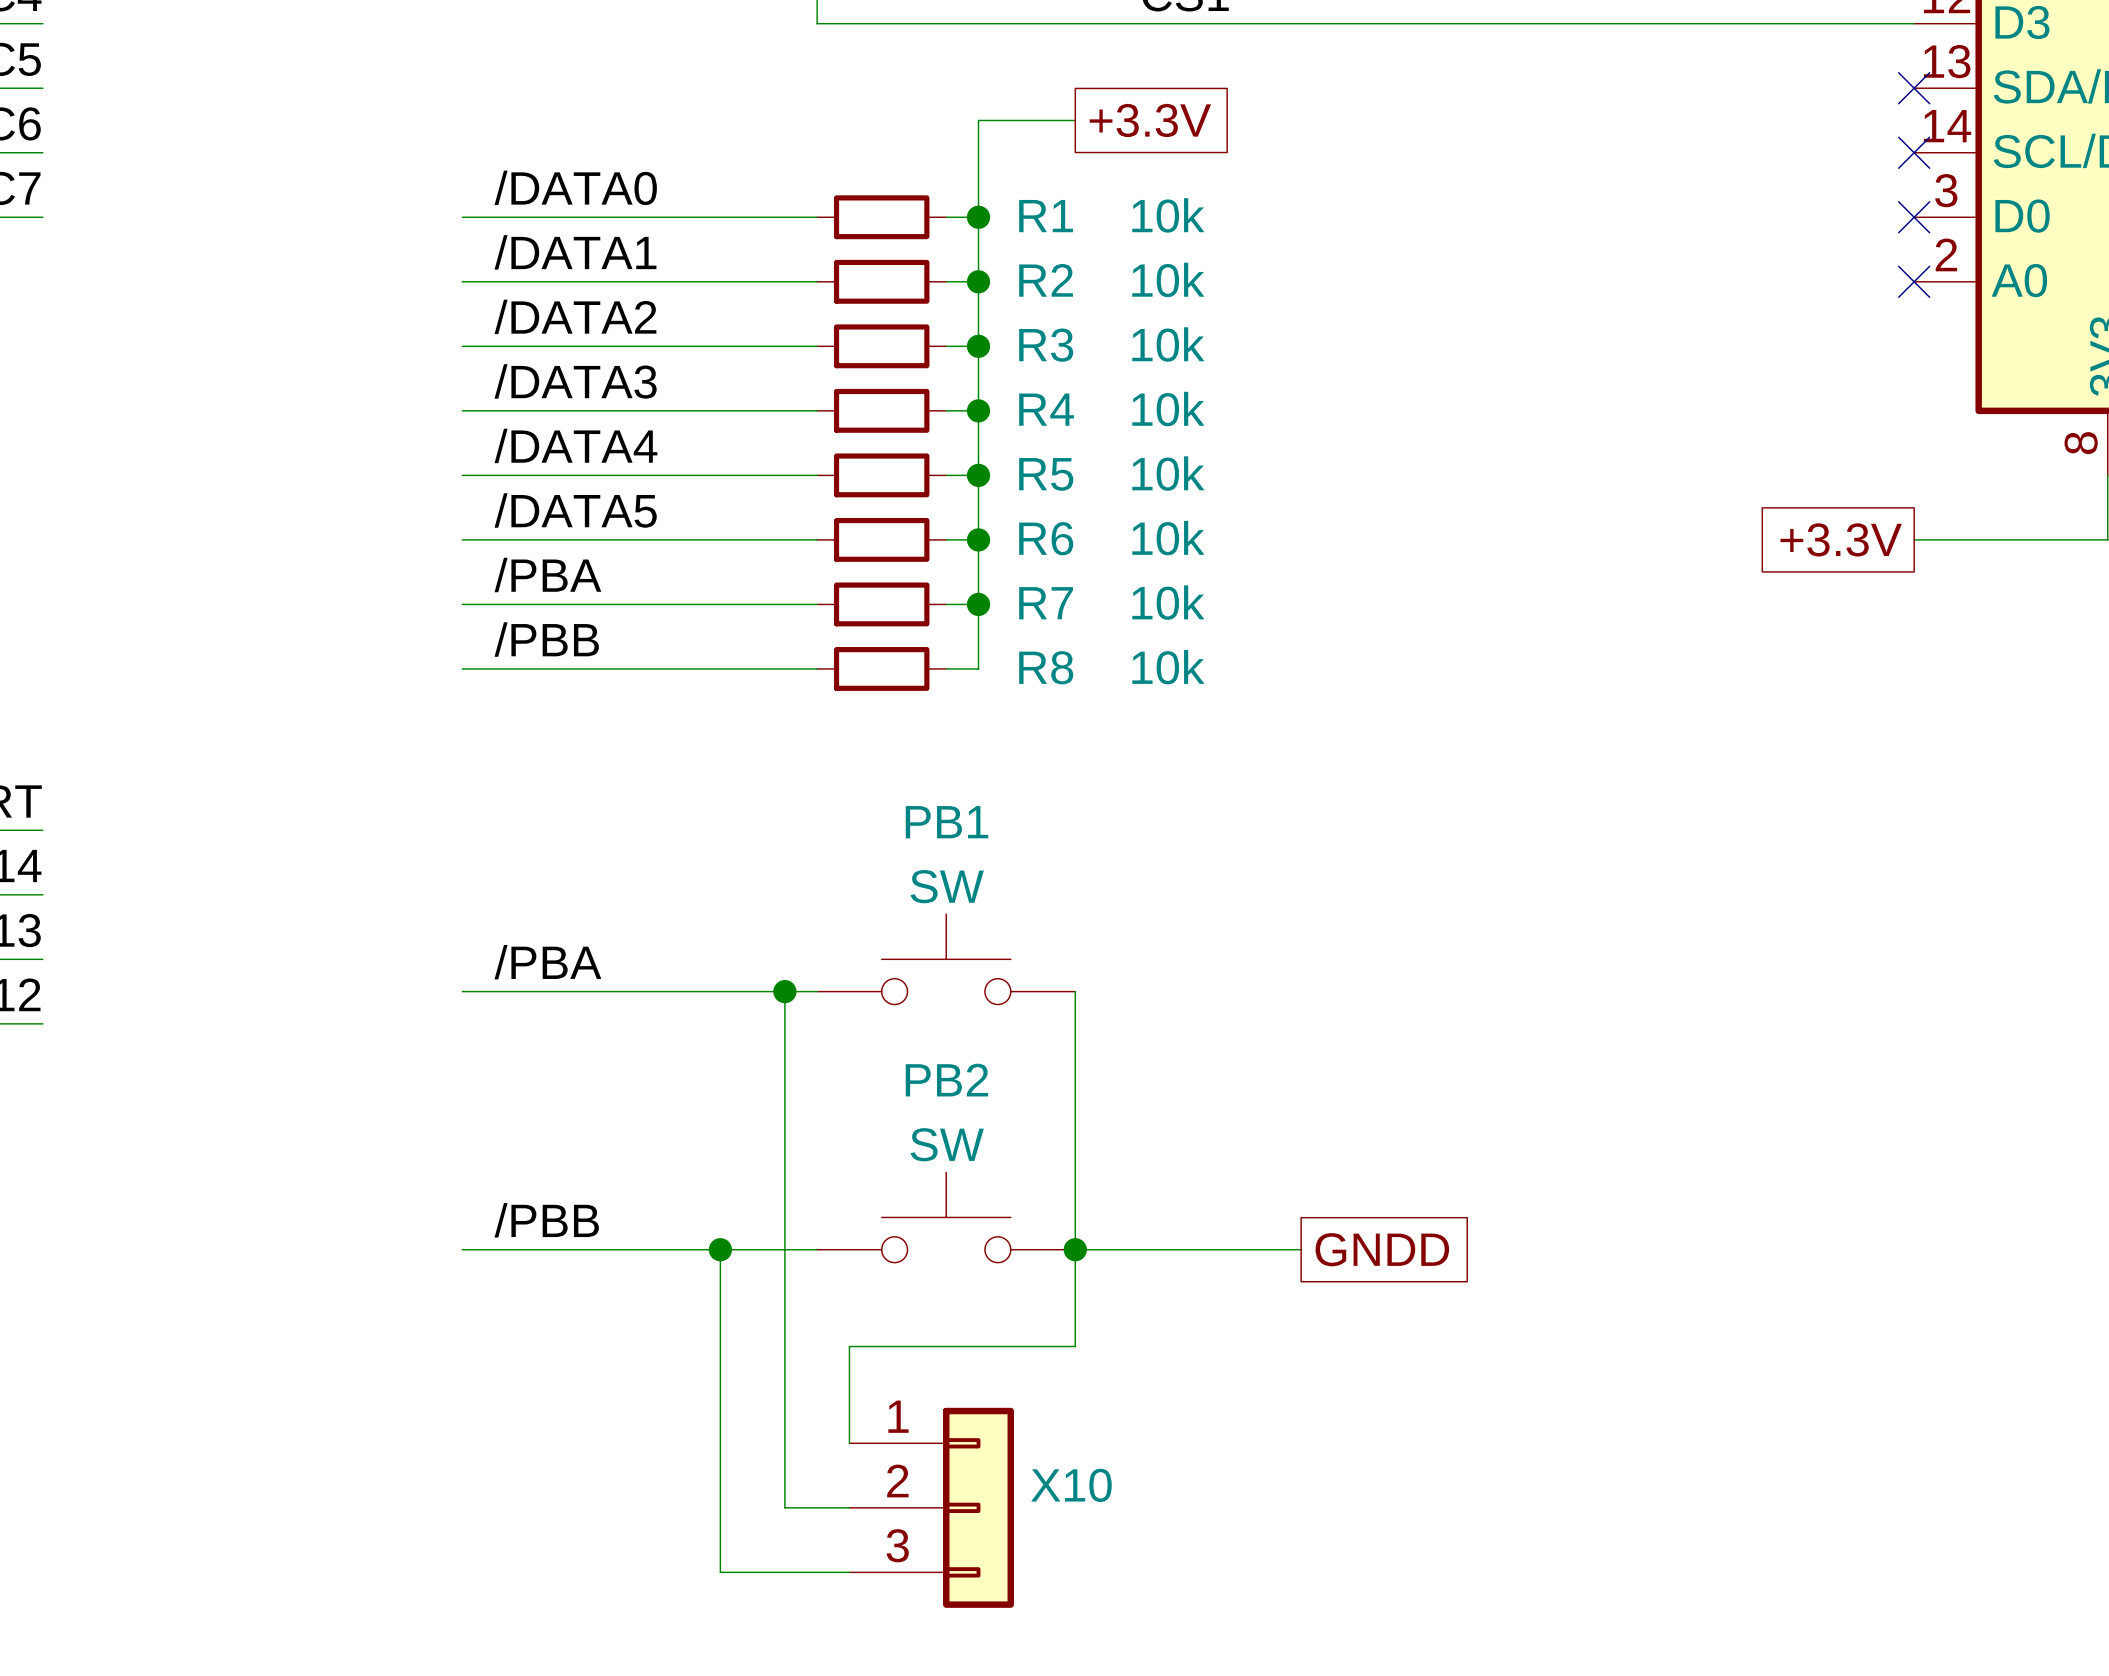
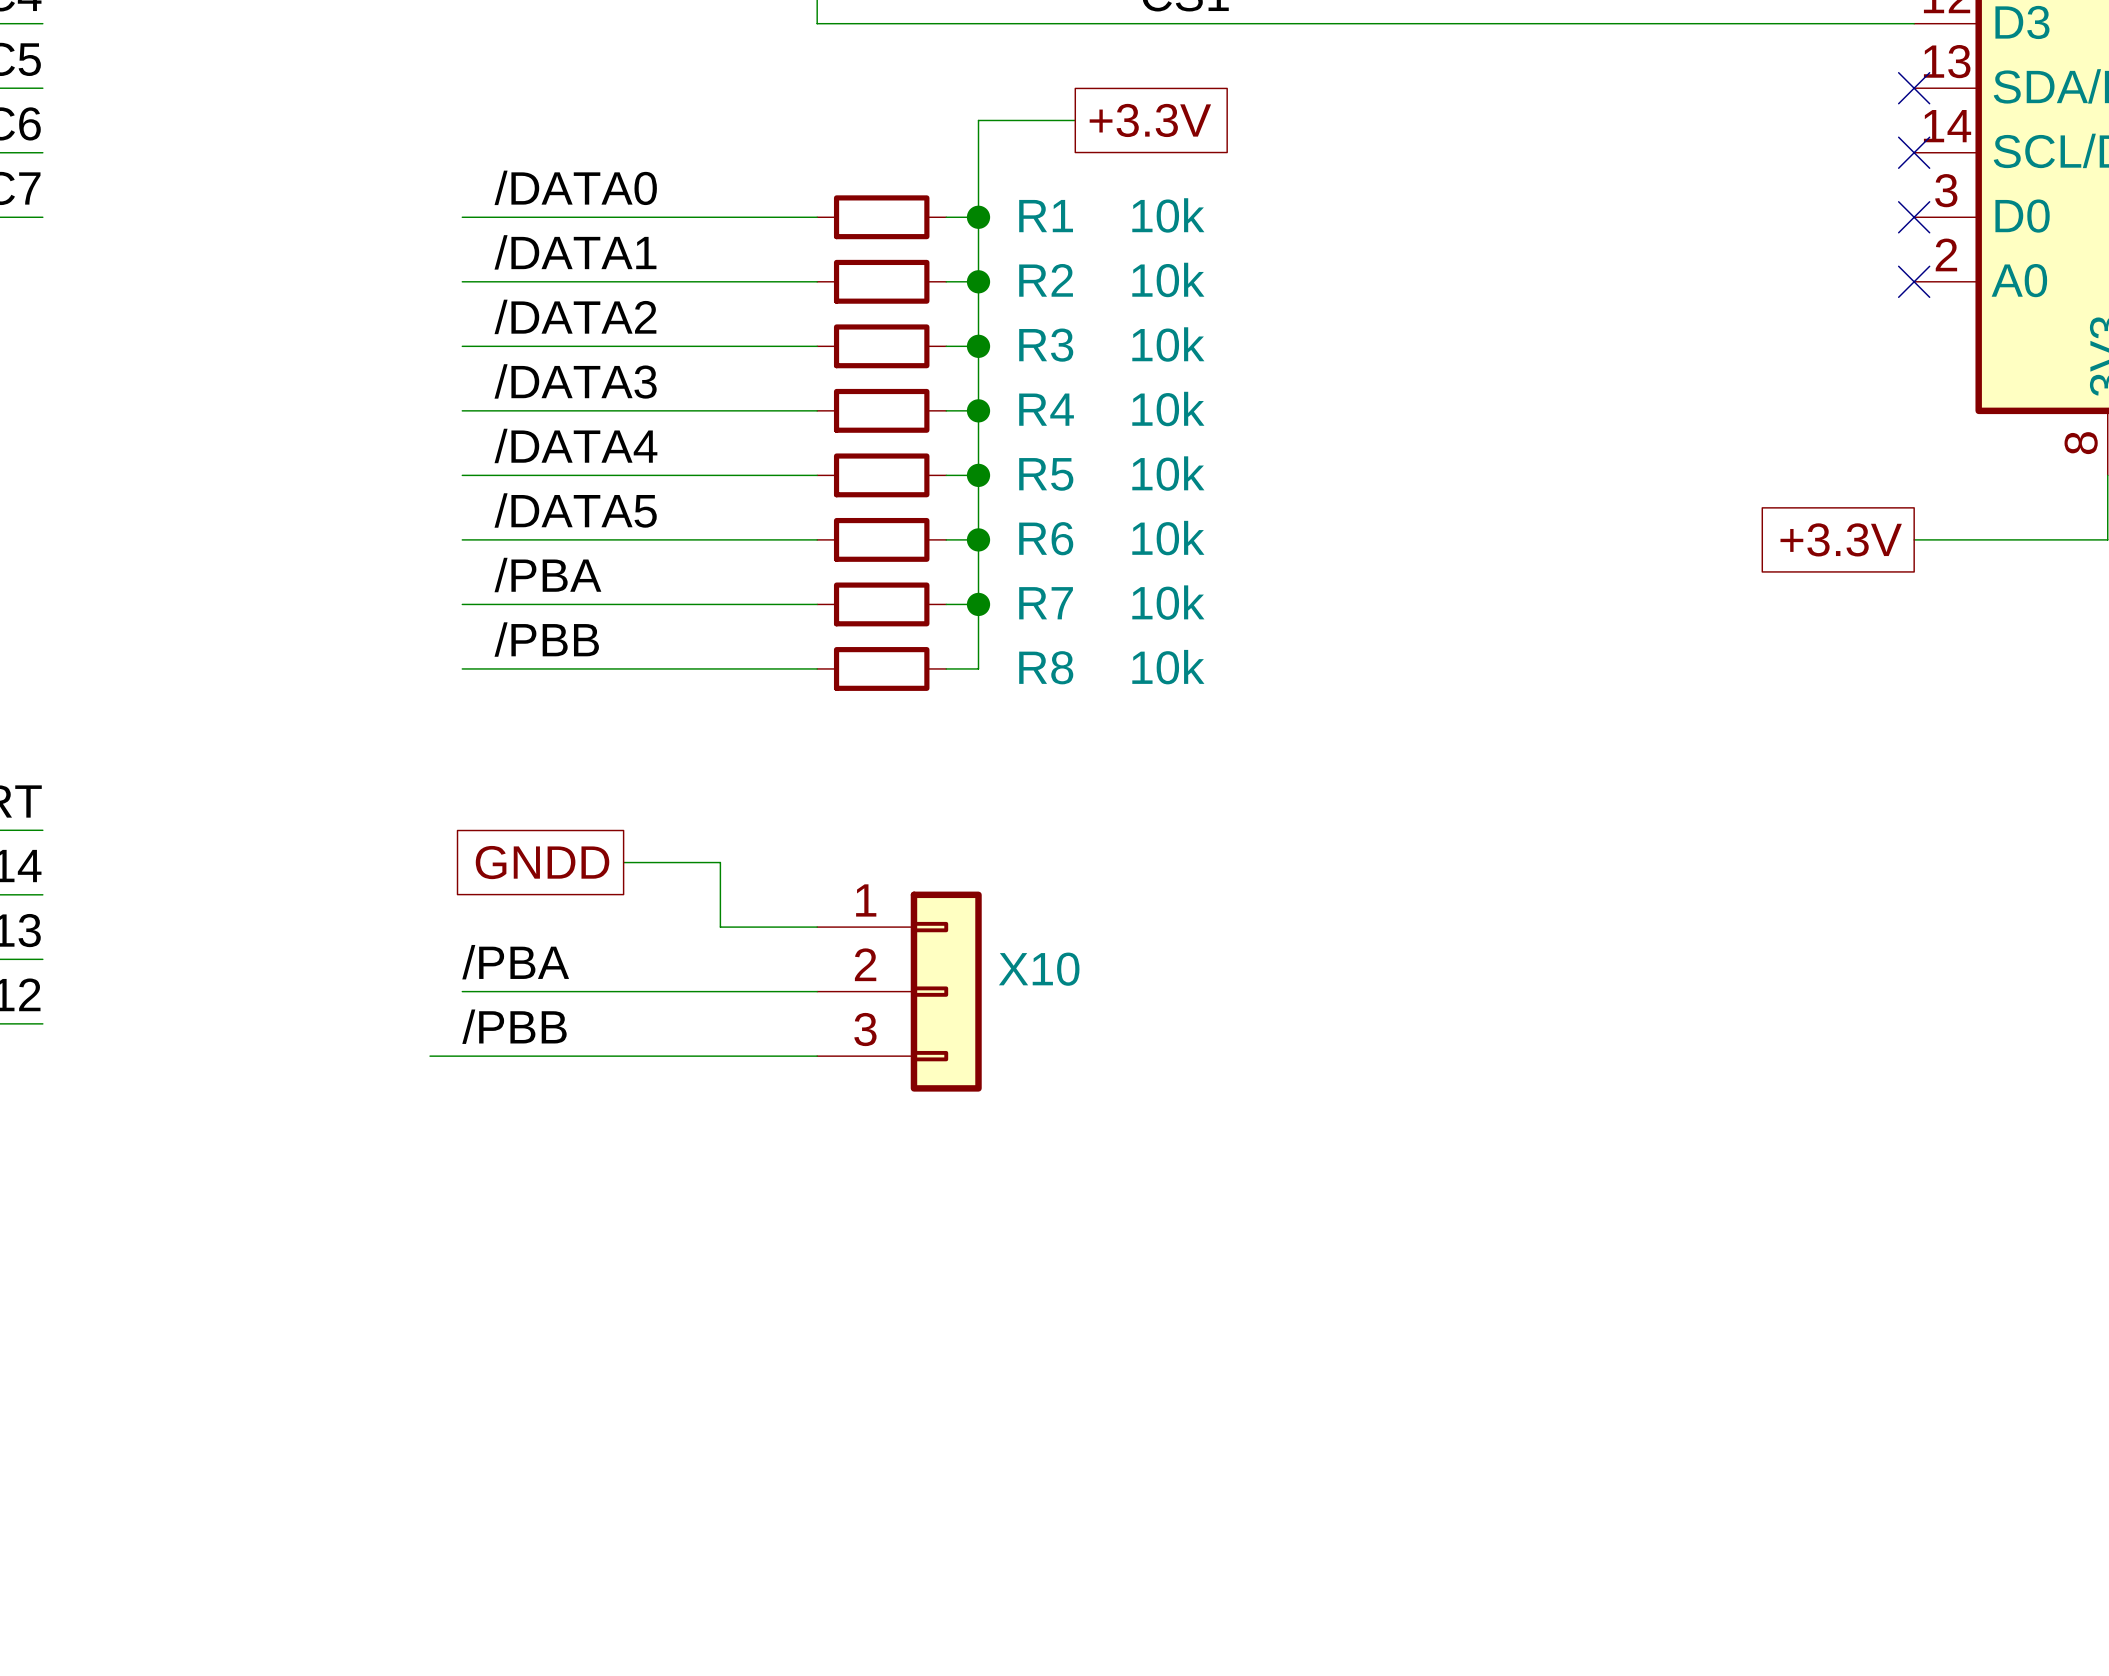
global label: none -> GNDD (542, 862)
wire: none -> (623, 862) (720, 862) (720, 927) (817, 927)
PB1: SW (946, 959) -> none
label position: /PBA (547, 962) -> /PBA (515, 962)
wire: (784, 991) (784, 1507) (849, 1507) -> none
junction: (784, 991) -> none
wire: (1075, 991) (1075, 1346) (849, 1346) (849, 1443) -> none
wire: none -> (430, 1056) (817, 1056)
PB2: SW (946, 1217) -> none
label position: /PBB (546, 1220) -> /PBB (514, 1026)
wire: (462, 1249) (817, 1249) -> none
wire: (720, 1249) (720, 1572) (849, 1572) -> none
junction: (720, 1249) -> none
wire: (1075, 1249) (1301, 1249) -> none
junction: (1075, 1249) -> none
global label: GNDD (1382, 1249) -> none
X10 position: (931, 1507) -> (899, 991)

